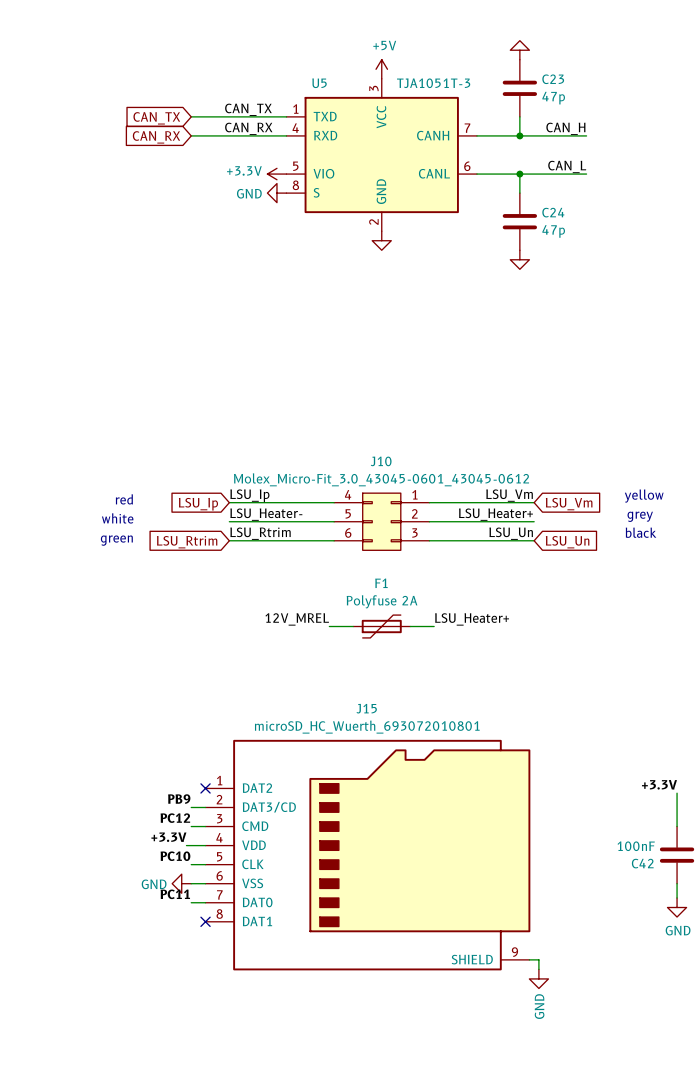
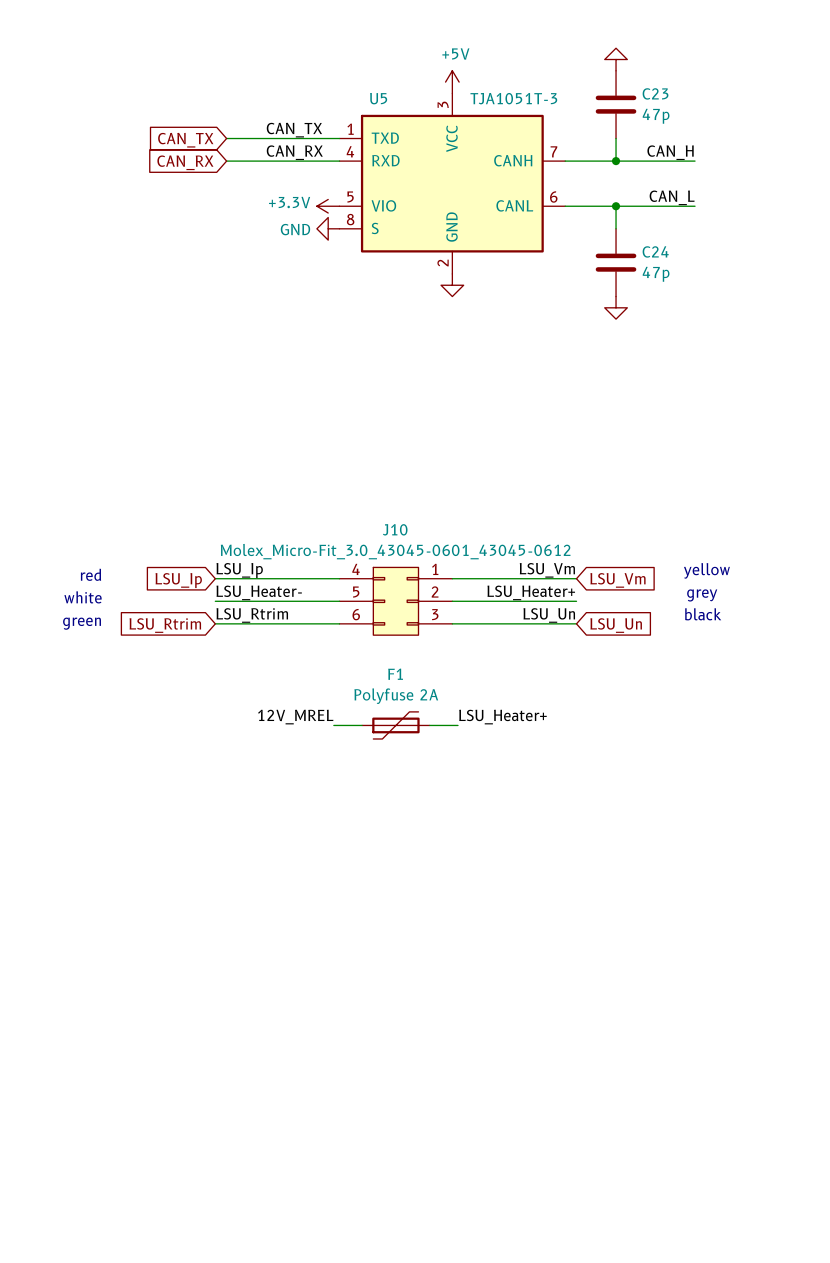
label position: LSU_Ip (249, 495) -> LSU_Ip (239, 570)
label position: LSU_Vm (509, 495) -> LSU_Vm (547, 570)
text position: yellow (644, 496) -> yellow (706, 570)
text position: red (124, 499) -> red (91, 574)
wire: (229, 502) (334, 502) -> (215, 578) (339, 578)
wire: (429, 502) (534, 502) -> (452, 578) (576, 578)
global label position: LSU_Ip (198, 504) -> LSU_Ip (178, 580)
global label position: LSU_Vm (569, 504) -> LSU_Vm (617, 580)
label position: LSU_Heater- (266, 514) -> LSU_Heater- (259, 592)
label position: LSU_Heater+ (495, 514) -> LSU_Heater+ (531, 592)
text position: grey (640, 516) -> grey (702, 595)
text position: white (117, 518) -> white (83, 597)
wire: (229, 521) (334, 521) -> (215, 601) (339, 601)
J10 position: (381, 521) -> (395, 601)
wire: (429, 521) (534, 521) -> (452, 601) (576, 601)
text position: black (641, 532) -> black (703, 614)
label position: LSU_Rtrim (260, 533) -> LSU_Rtrim (252, 615)
label position: LSU_Un (511, 533) -> LSU_Un (549, 615)
text position: green (116, 540) -> green (82, 623)
wire: (229, 540) (334, 540) -> (215, 623) (339, 623)
wire: (429, 540) (534, 540) -> (452, 623) (576, 623)
global label position: LSU_Rtrim (187, 542) -> LSU_Rtrim (165, 625)
global label position: LSU_Un (567, 542) -> LSU_Un (616, 625)
label position: 12V_MREL (297, 619) -> 12V_MREL (295, 717)
label position: LSU_Heater+ (472, 619) -> LSU_Heater+ (502, 717)
wire: (329, 626) (353, 626) -> (333, 725) (362, 725)
F1 position: (381, 626) -> (395, 725)
wire: (410, 626) (434, 626) -> (429, 725) (458, 725)
label: +3.3V (659, 784) -> none
no-connect mark: (205, 788) -> none
wire: (677, 793) (677, 826) -> none
label: PB9 (179, 799) -> none
wire: (191, 807) (205, 807) -> none
label: PC12 (175, 818) -> none
wire: (191, 826) (205, 826) -> none
label: +3.3V (168, 837) -> none
wire: (186, 845) (205, 845) -> none
J15: microSD_HC_Wuerth_693072010801 (367, 855) -> none
C42: 100nF (677, 855) -> none
label: PC10 (175, 856) -> none
wire: (191, 864) (205, 864) -> none
power symbol: GND (181, 883) -> none
wire: (191, 883) (205, 883) -> none
wire: (677, 883) (677, 897) -> none
label: PC11 (175, 894) -> none
wire: (191, 902) (205, 902) -> none
power symbol: GND (677, 907) -> none
no-connect mark: (205, 921) -> none
wire: (529, 959) (538, 959) (538, 969) -> none
power symbol: GND (538, 978) -> none

